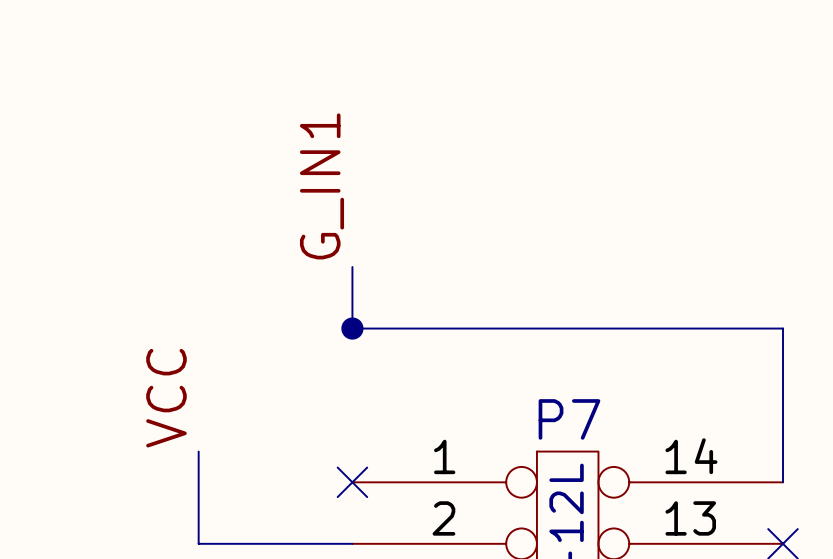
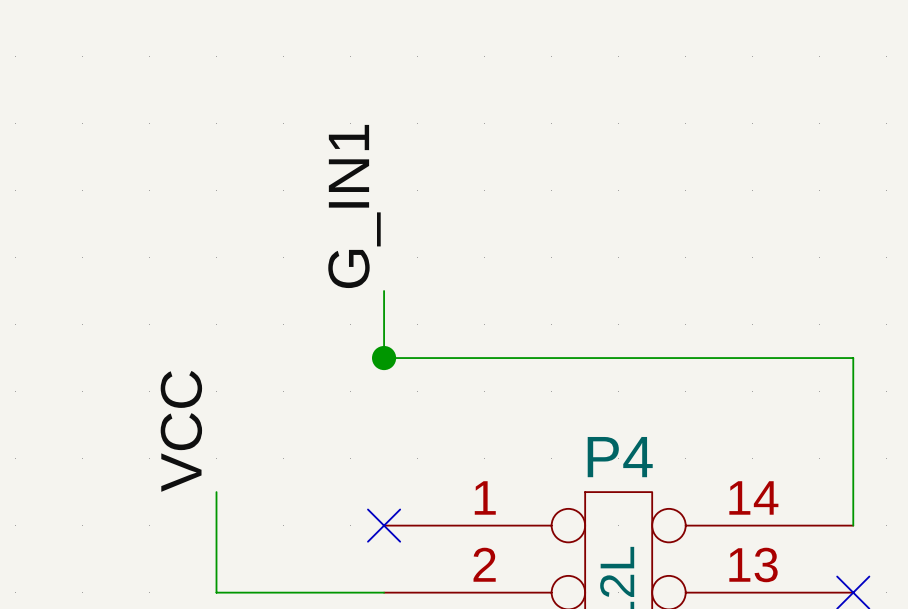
P7 name: P7 (569, 419) -> P4 (620, 457)

